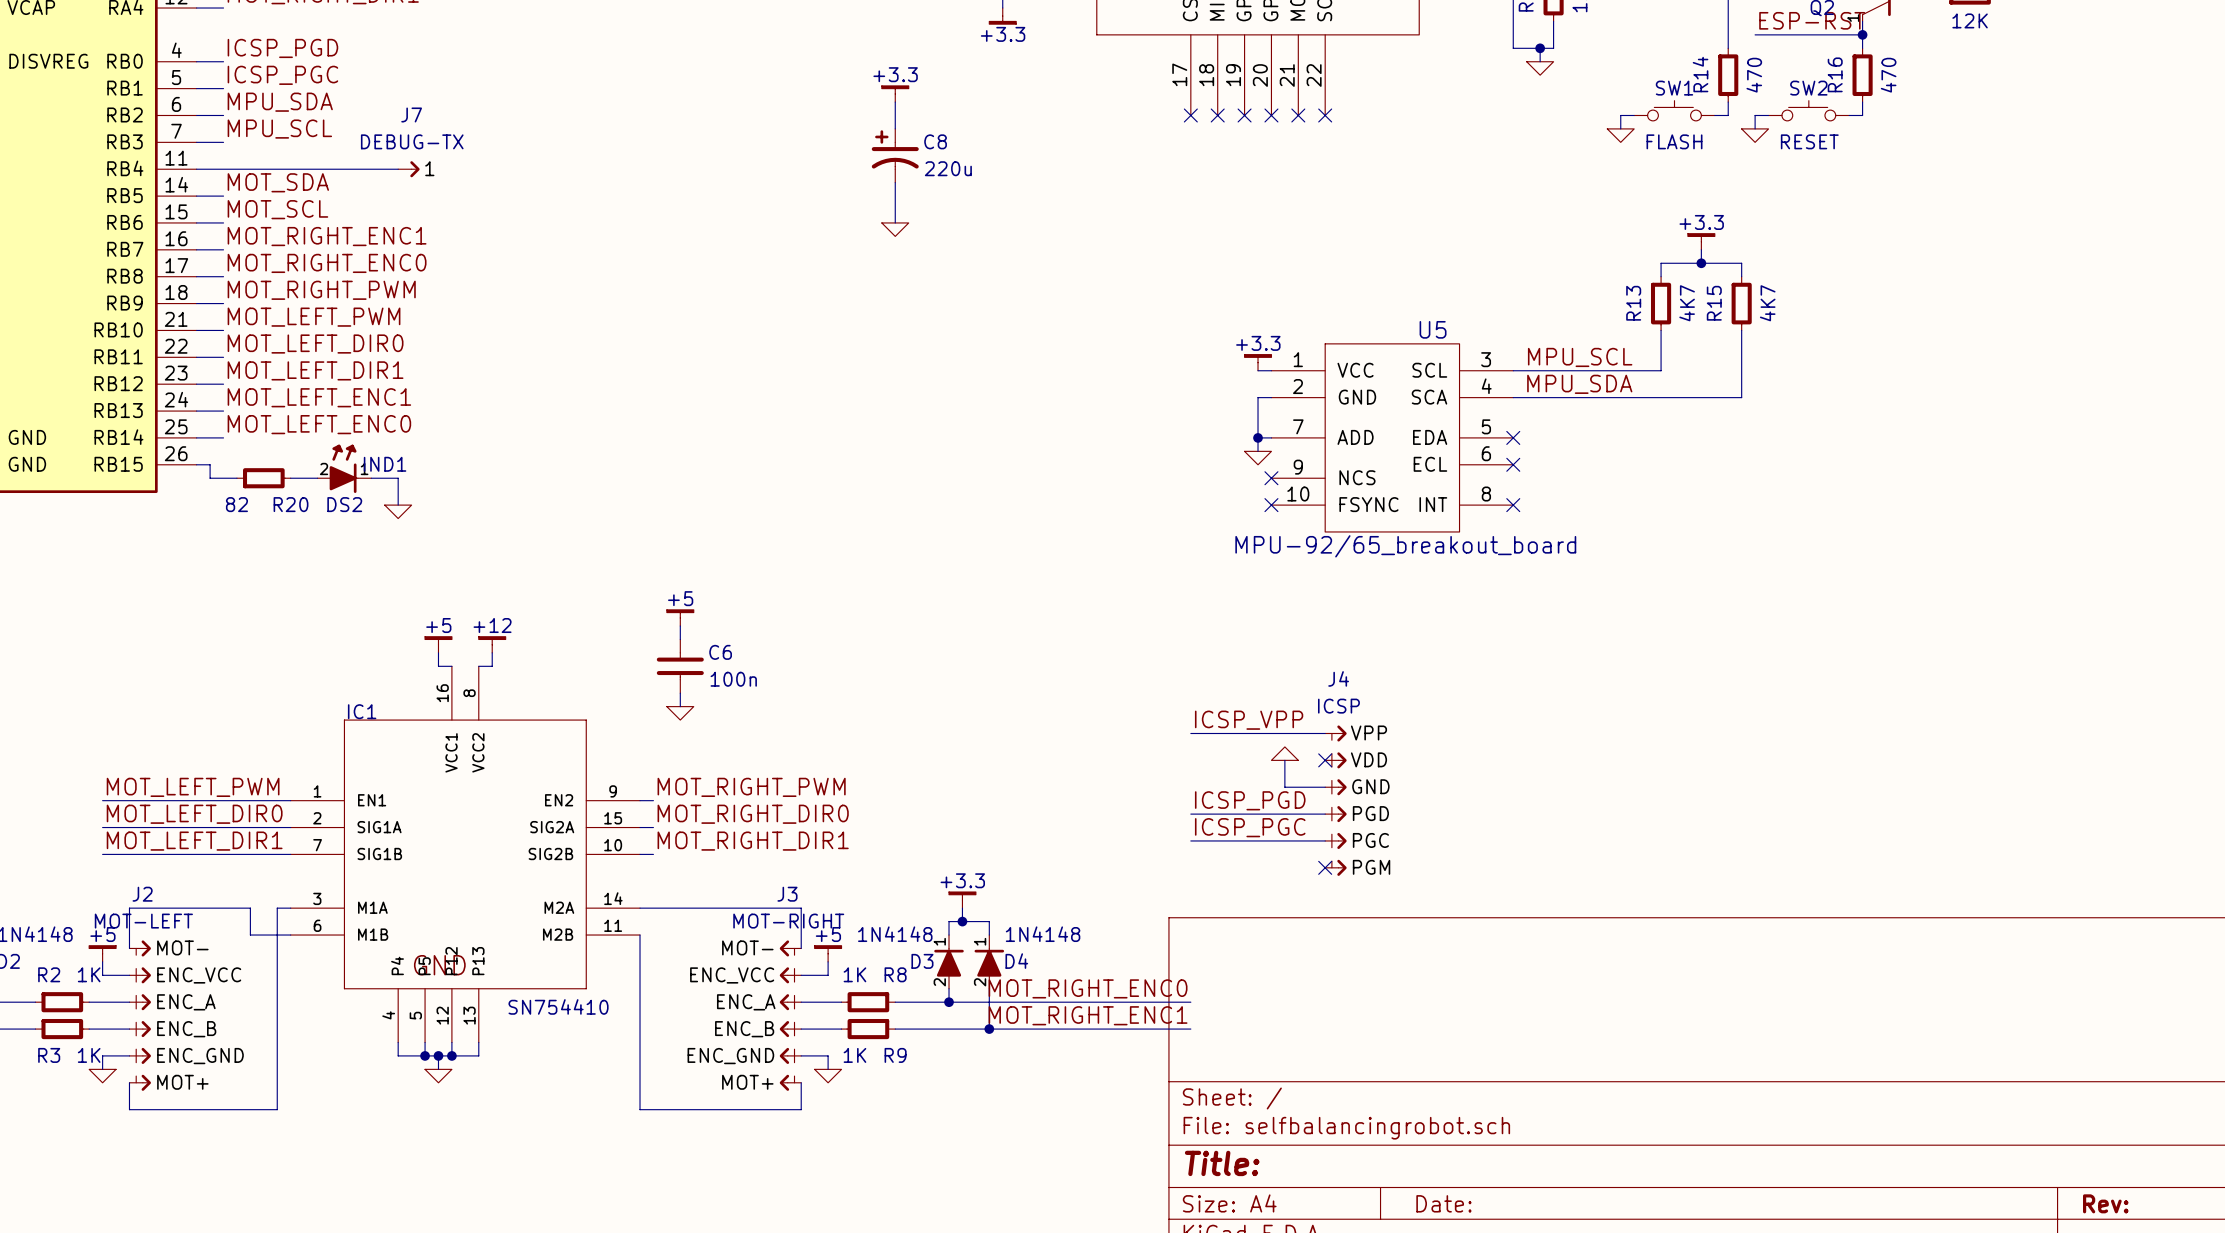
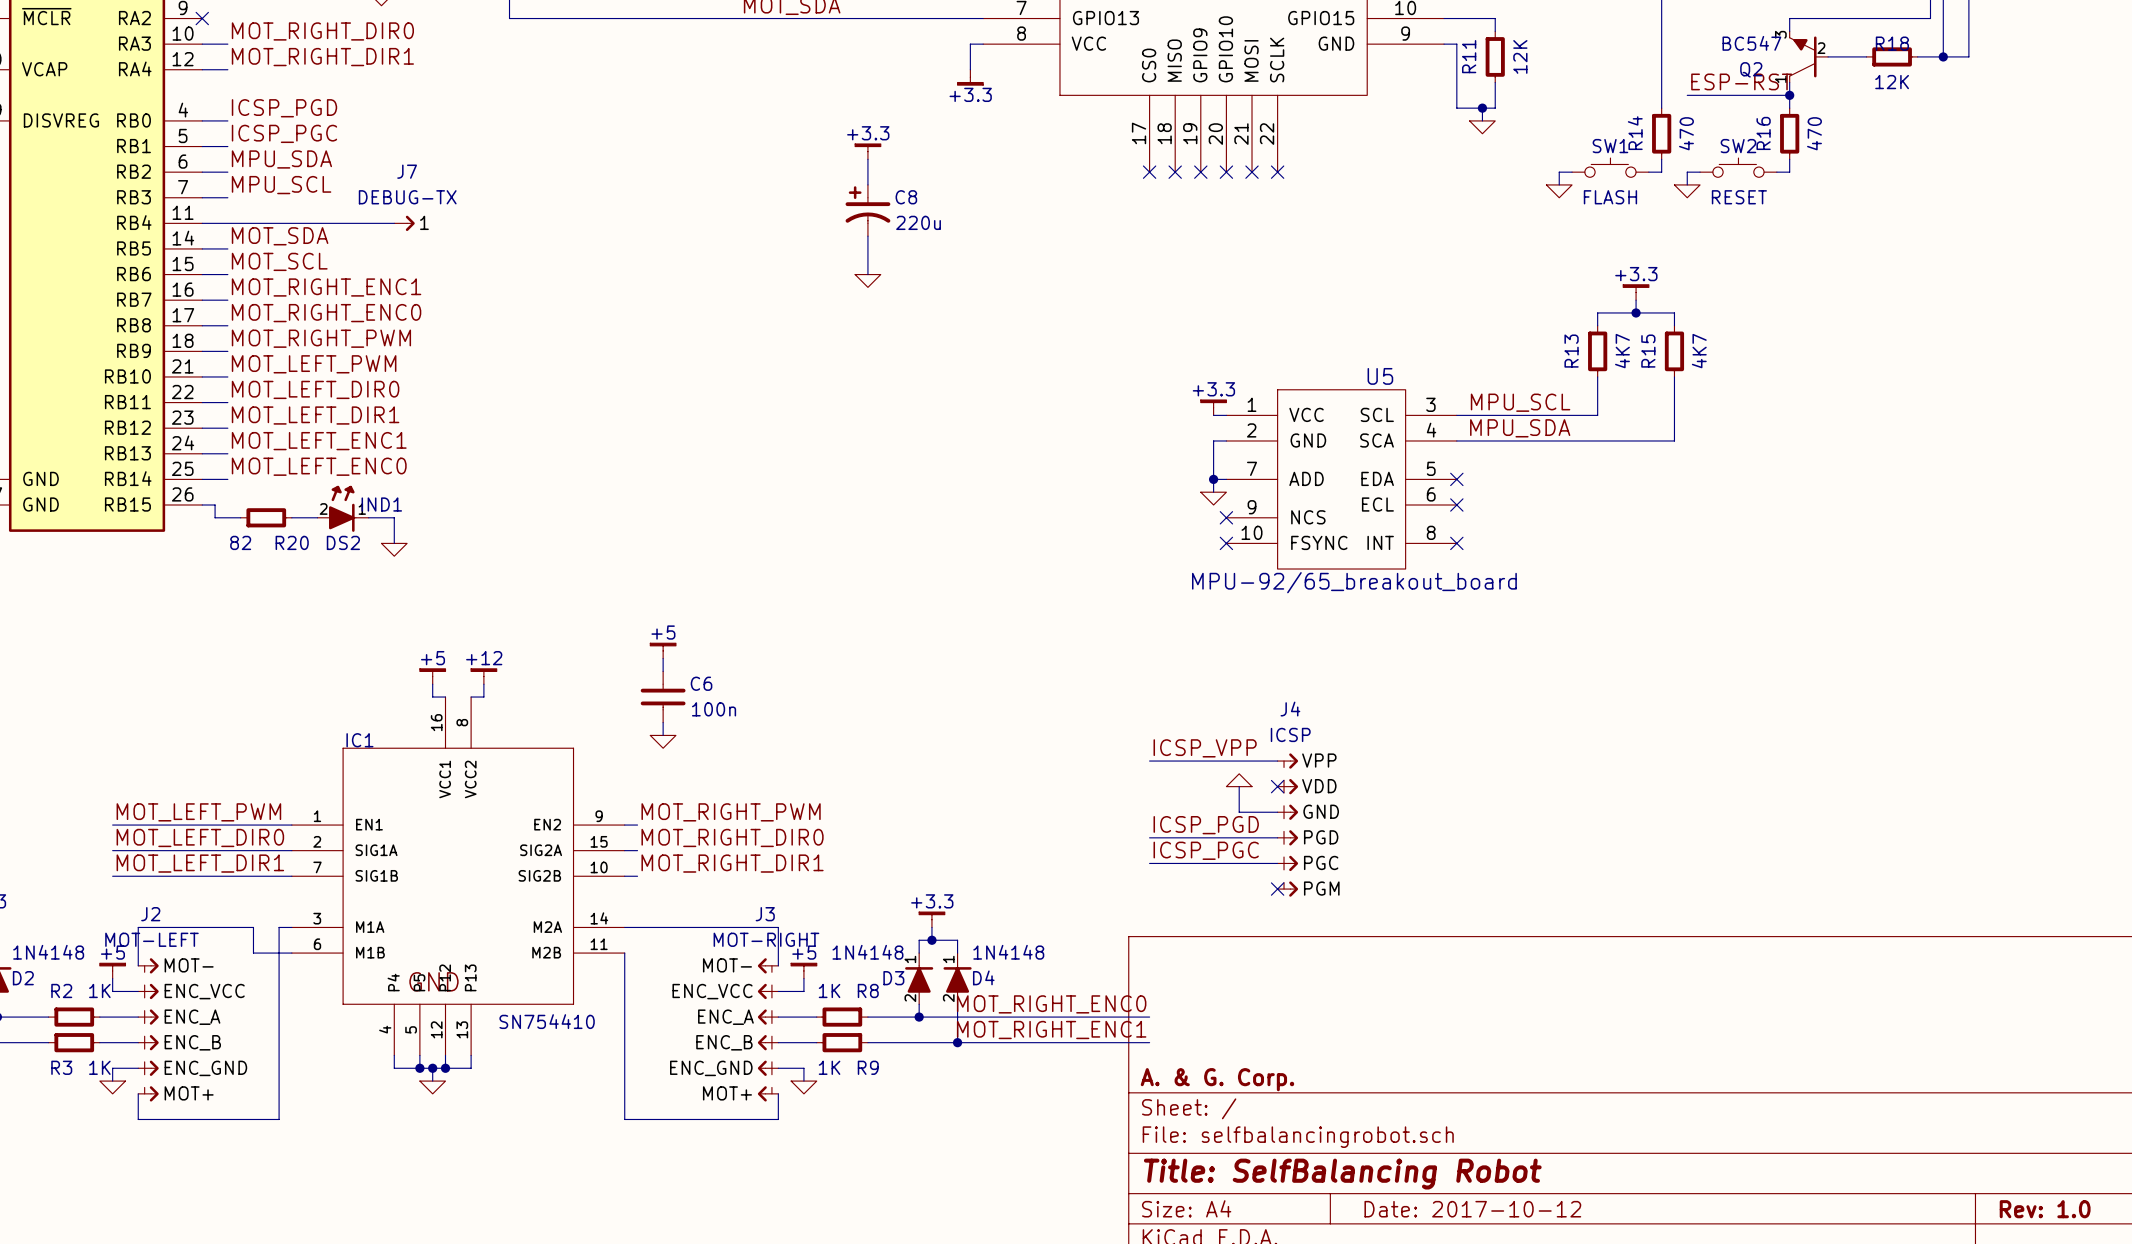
title block: none -> A. & G. Corp. (1217, 1079)
title block: Title: (1222, 1163) -> Title: SelfBalancing Robot (1342, 1174)
title block: Date: (1443, 1203) -> Date: 2017-10-12 (1472, 1209)
title block: Rev: (2105, 1203) -> Rev: 1.0 (2045, 1209)

